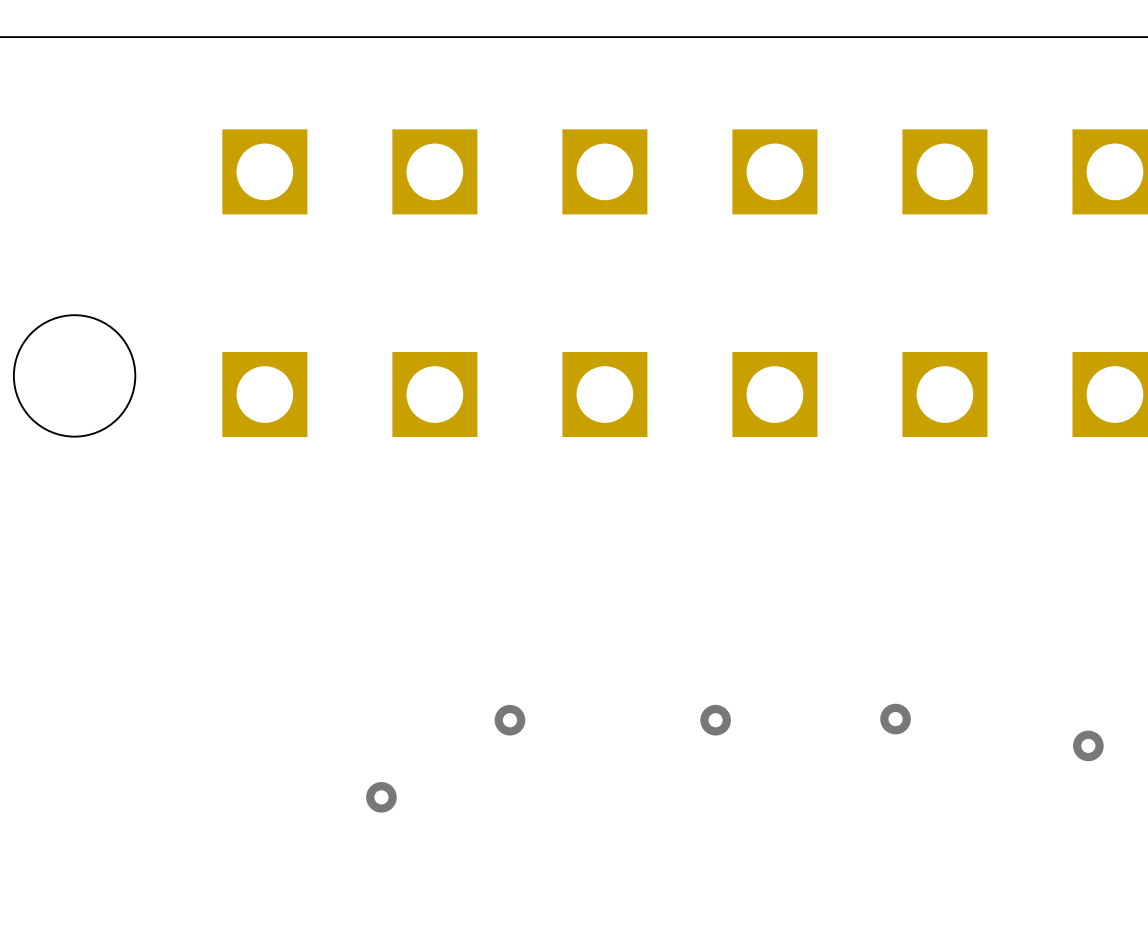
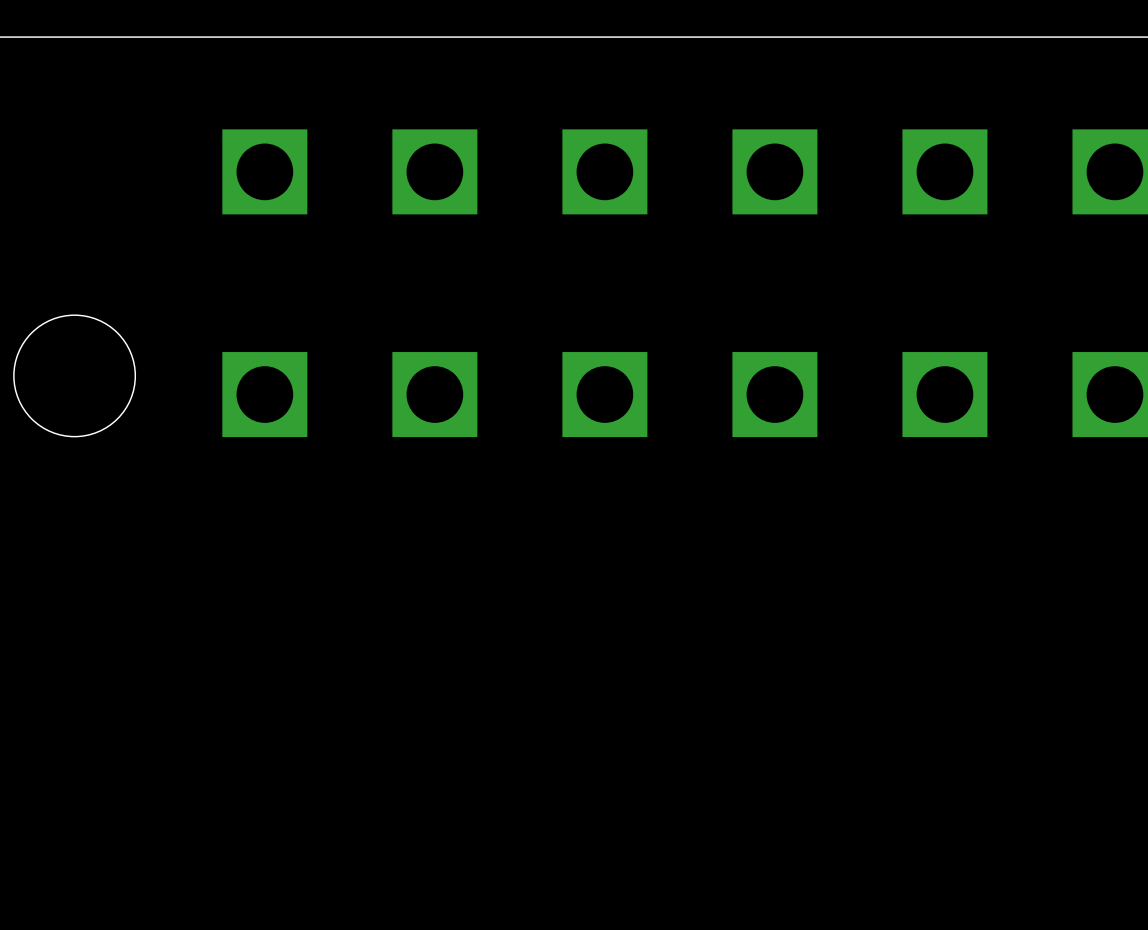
via: (895, 719) -> none
via: (509, 720) -> none
via: (715, 720) -> none
via: (1088, 745) -> none
via: (381, 797) -> none

